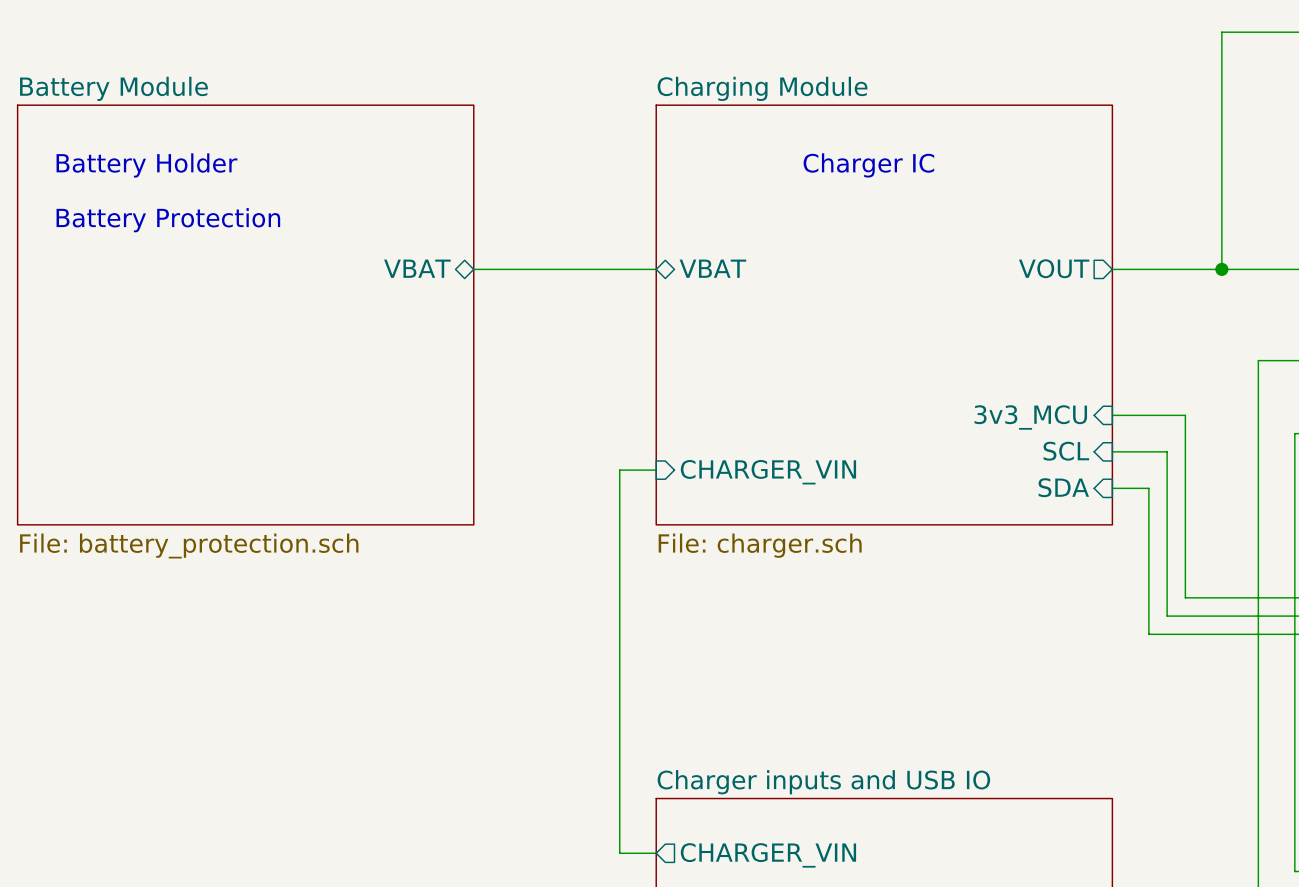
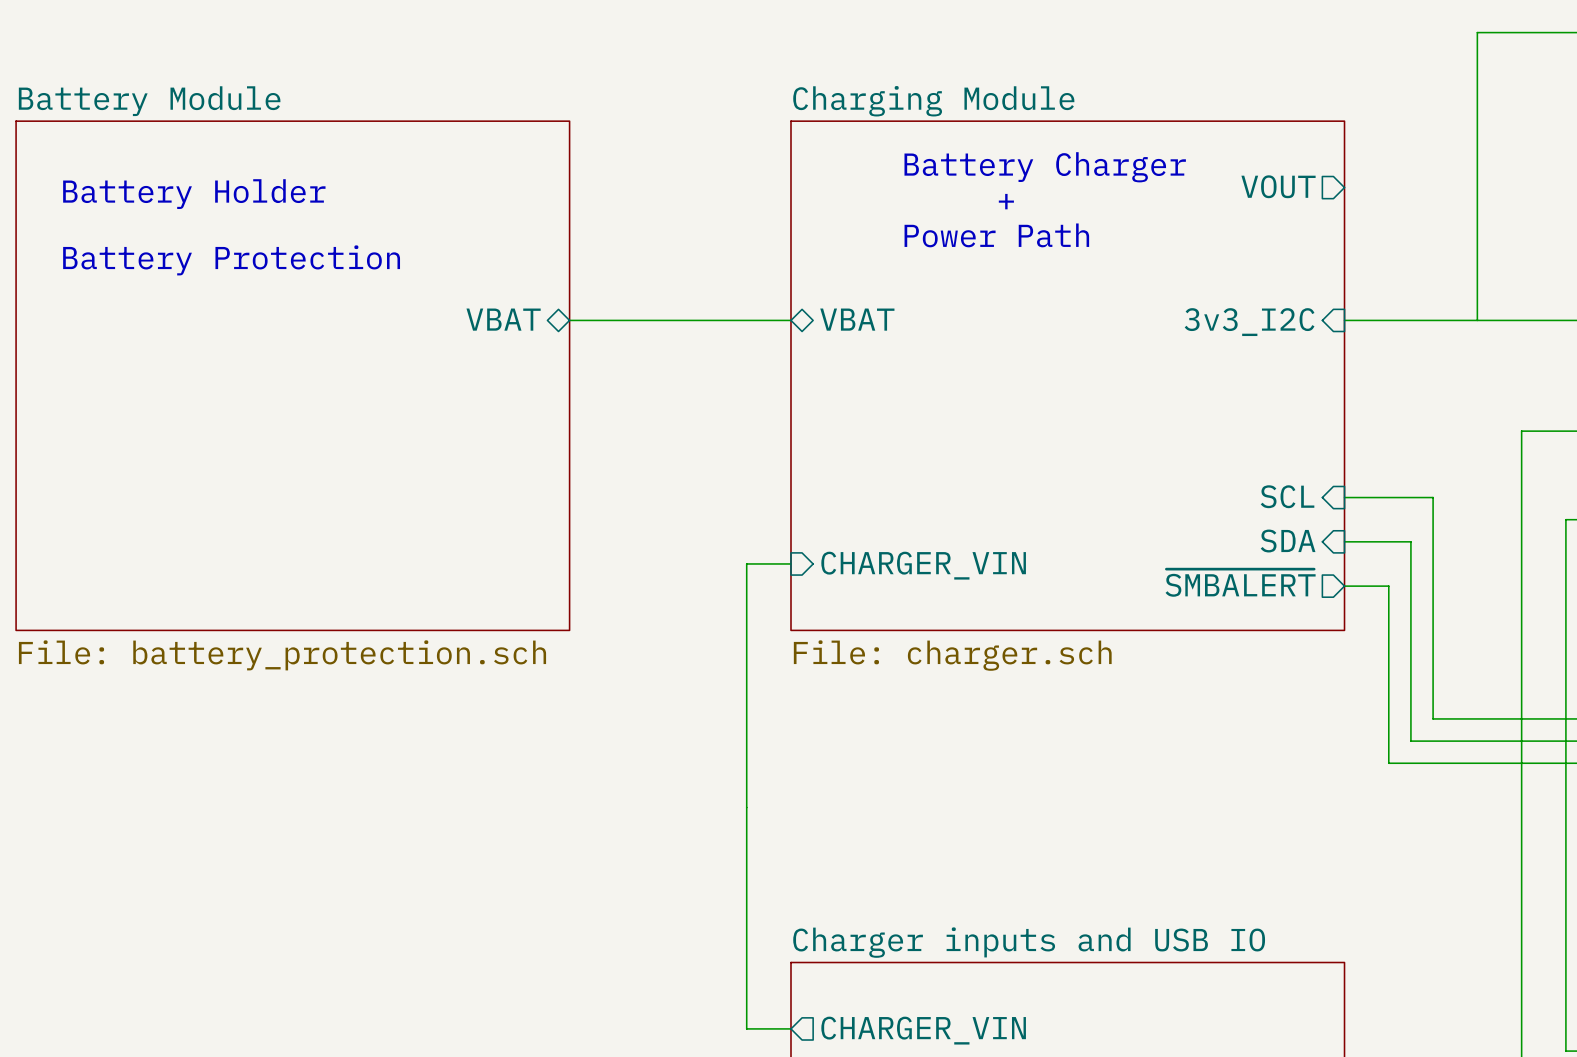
text: none -> Battery Charger (1045, 167)
sheet pin: none -> VOUT (1278, 186)
text: Charger IC (868, 165) -> none
text: none -> + (1006, 201)
text: none -> Power Path (996, 235)
sheet pin shape: output (1054, 268) -> input (1249, 322)
sheet pin: VOUT (1054, 268) -> 3v3_I2C (1249, 322)
junction: (1221, 269) -> none
sheet pin: 3v3_MCU (1030, 417) -> SCL (1287, 496)
sheet pin: SCL (1066, 451) -> SDA (1288, 541)
sheet pin shape: input (1063, 487) -> output (1240, 582)
sheet pin: SDA (1063, 487) -> ~{SMBALERT} (1240, 582)

